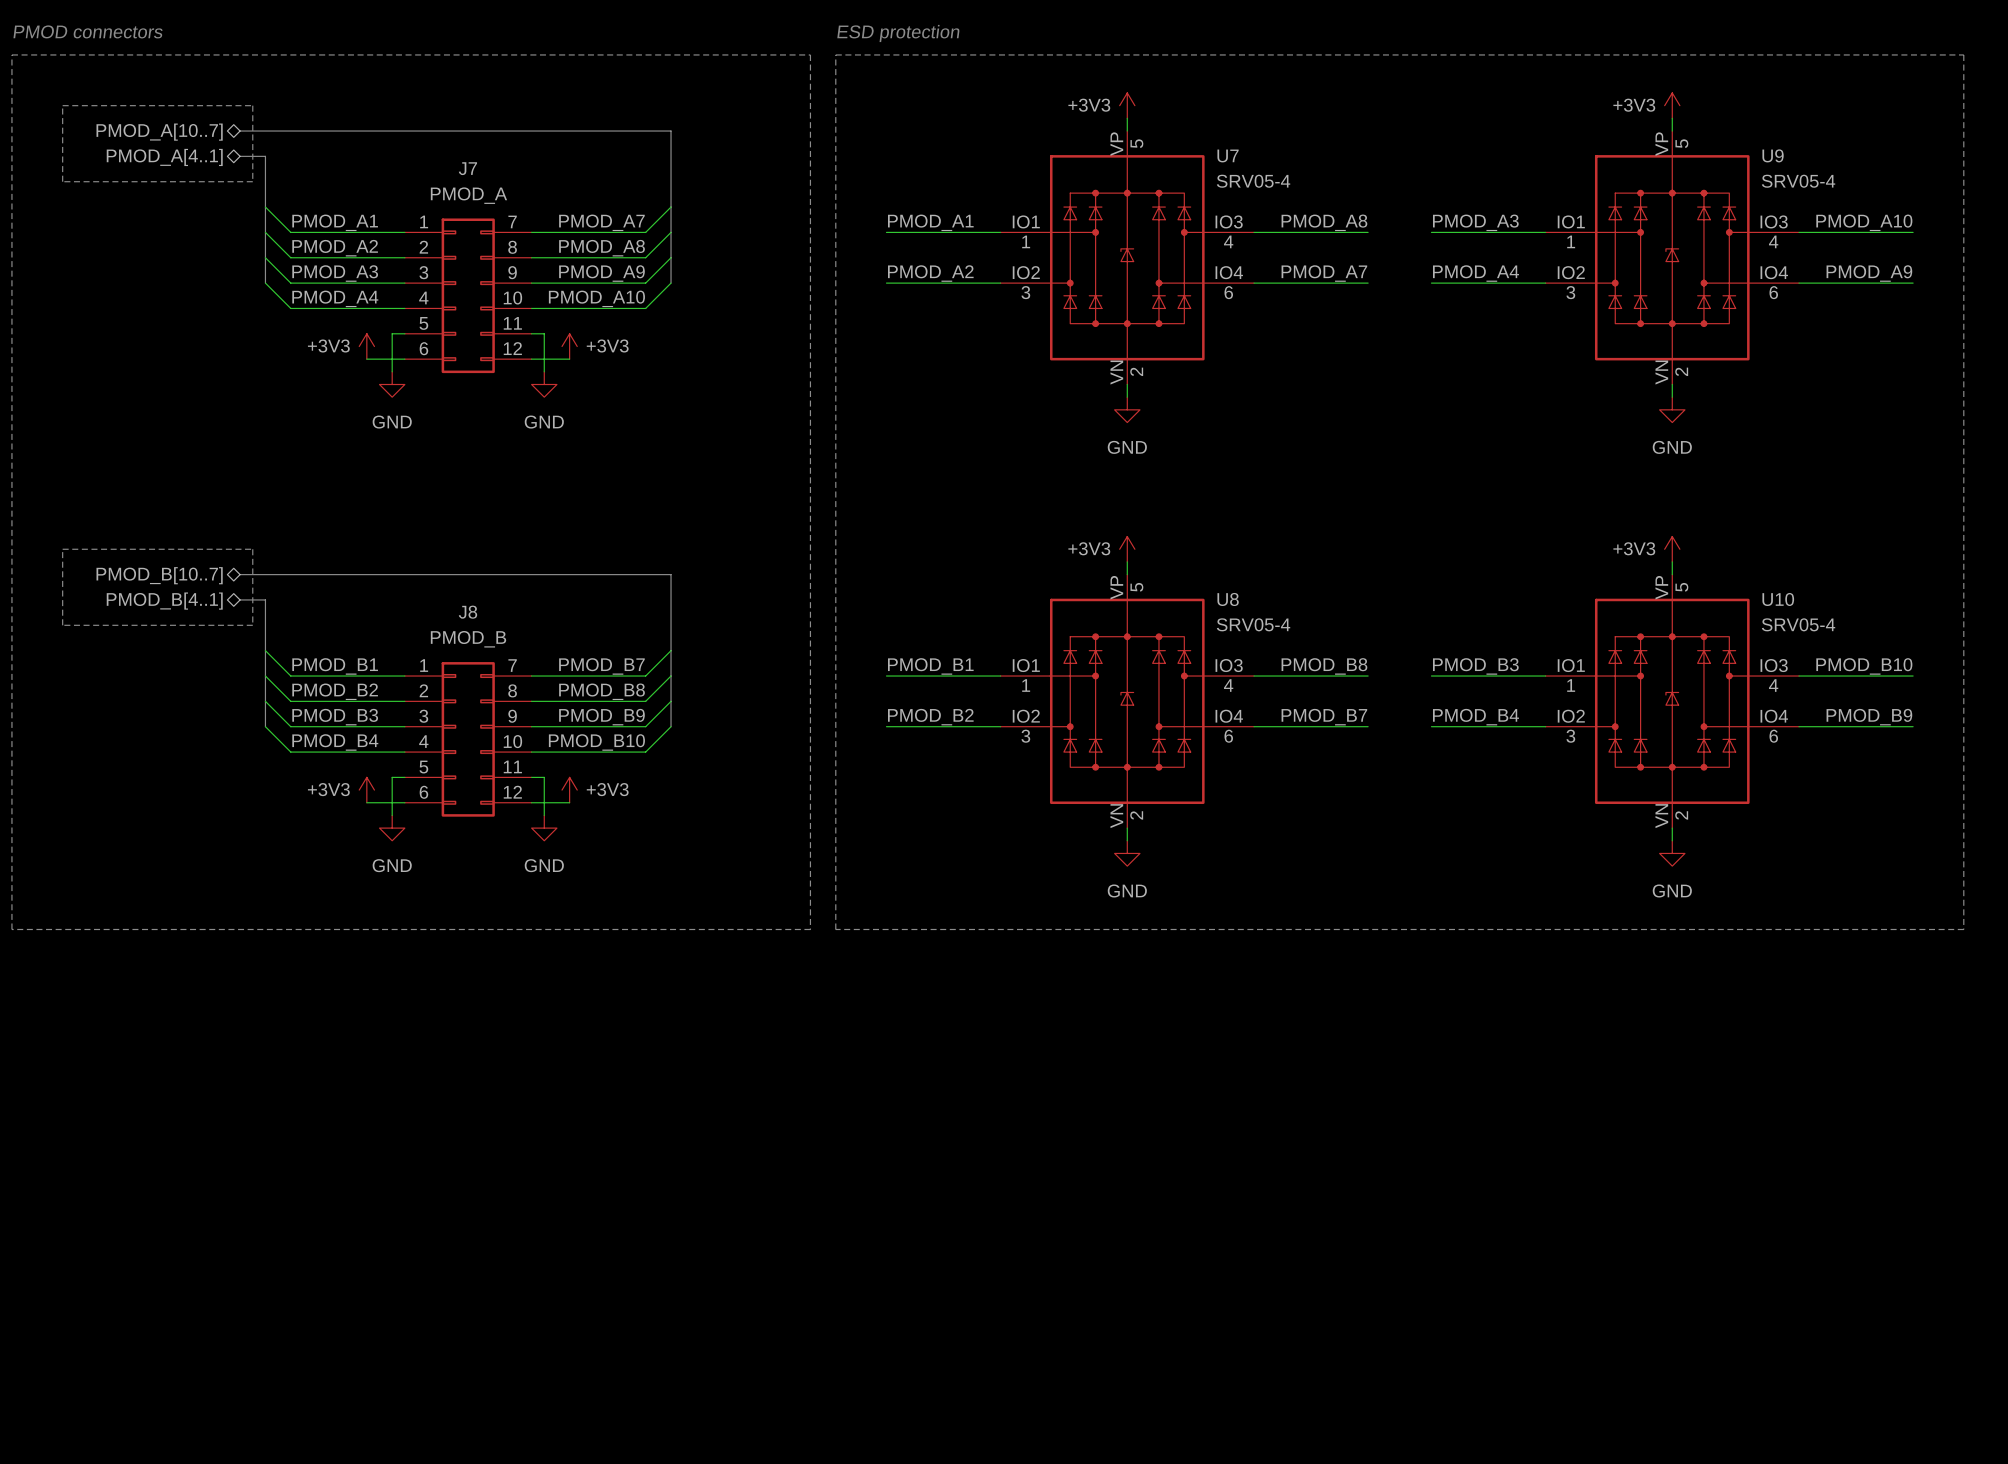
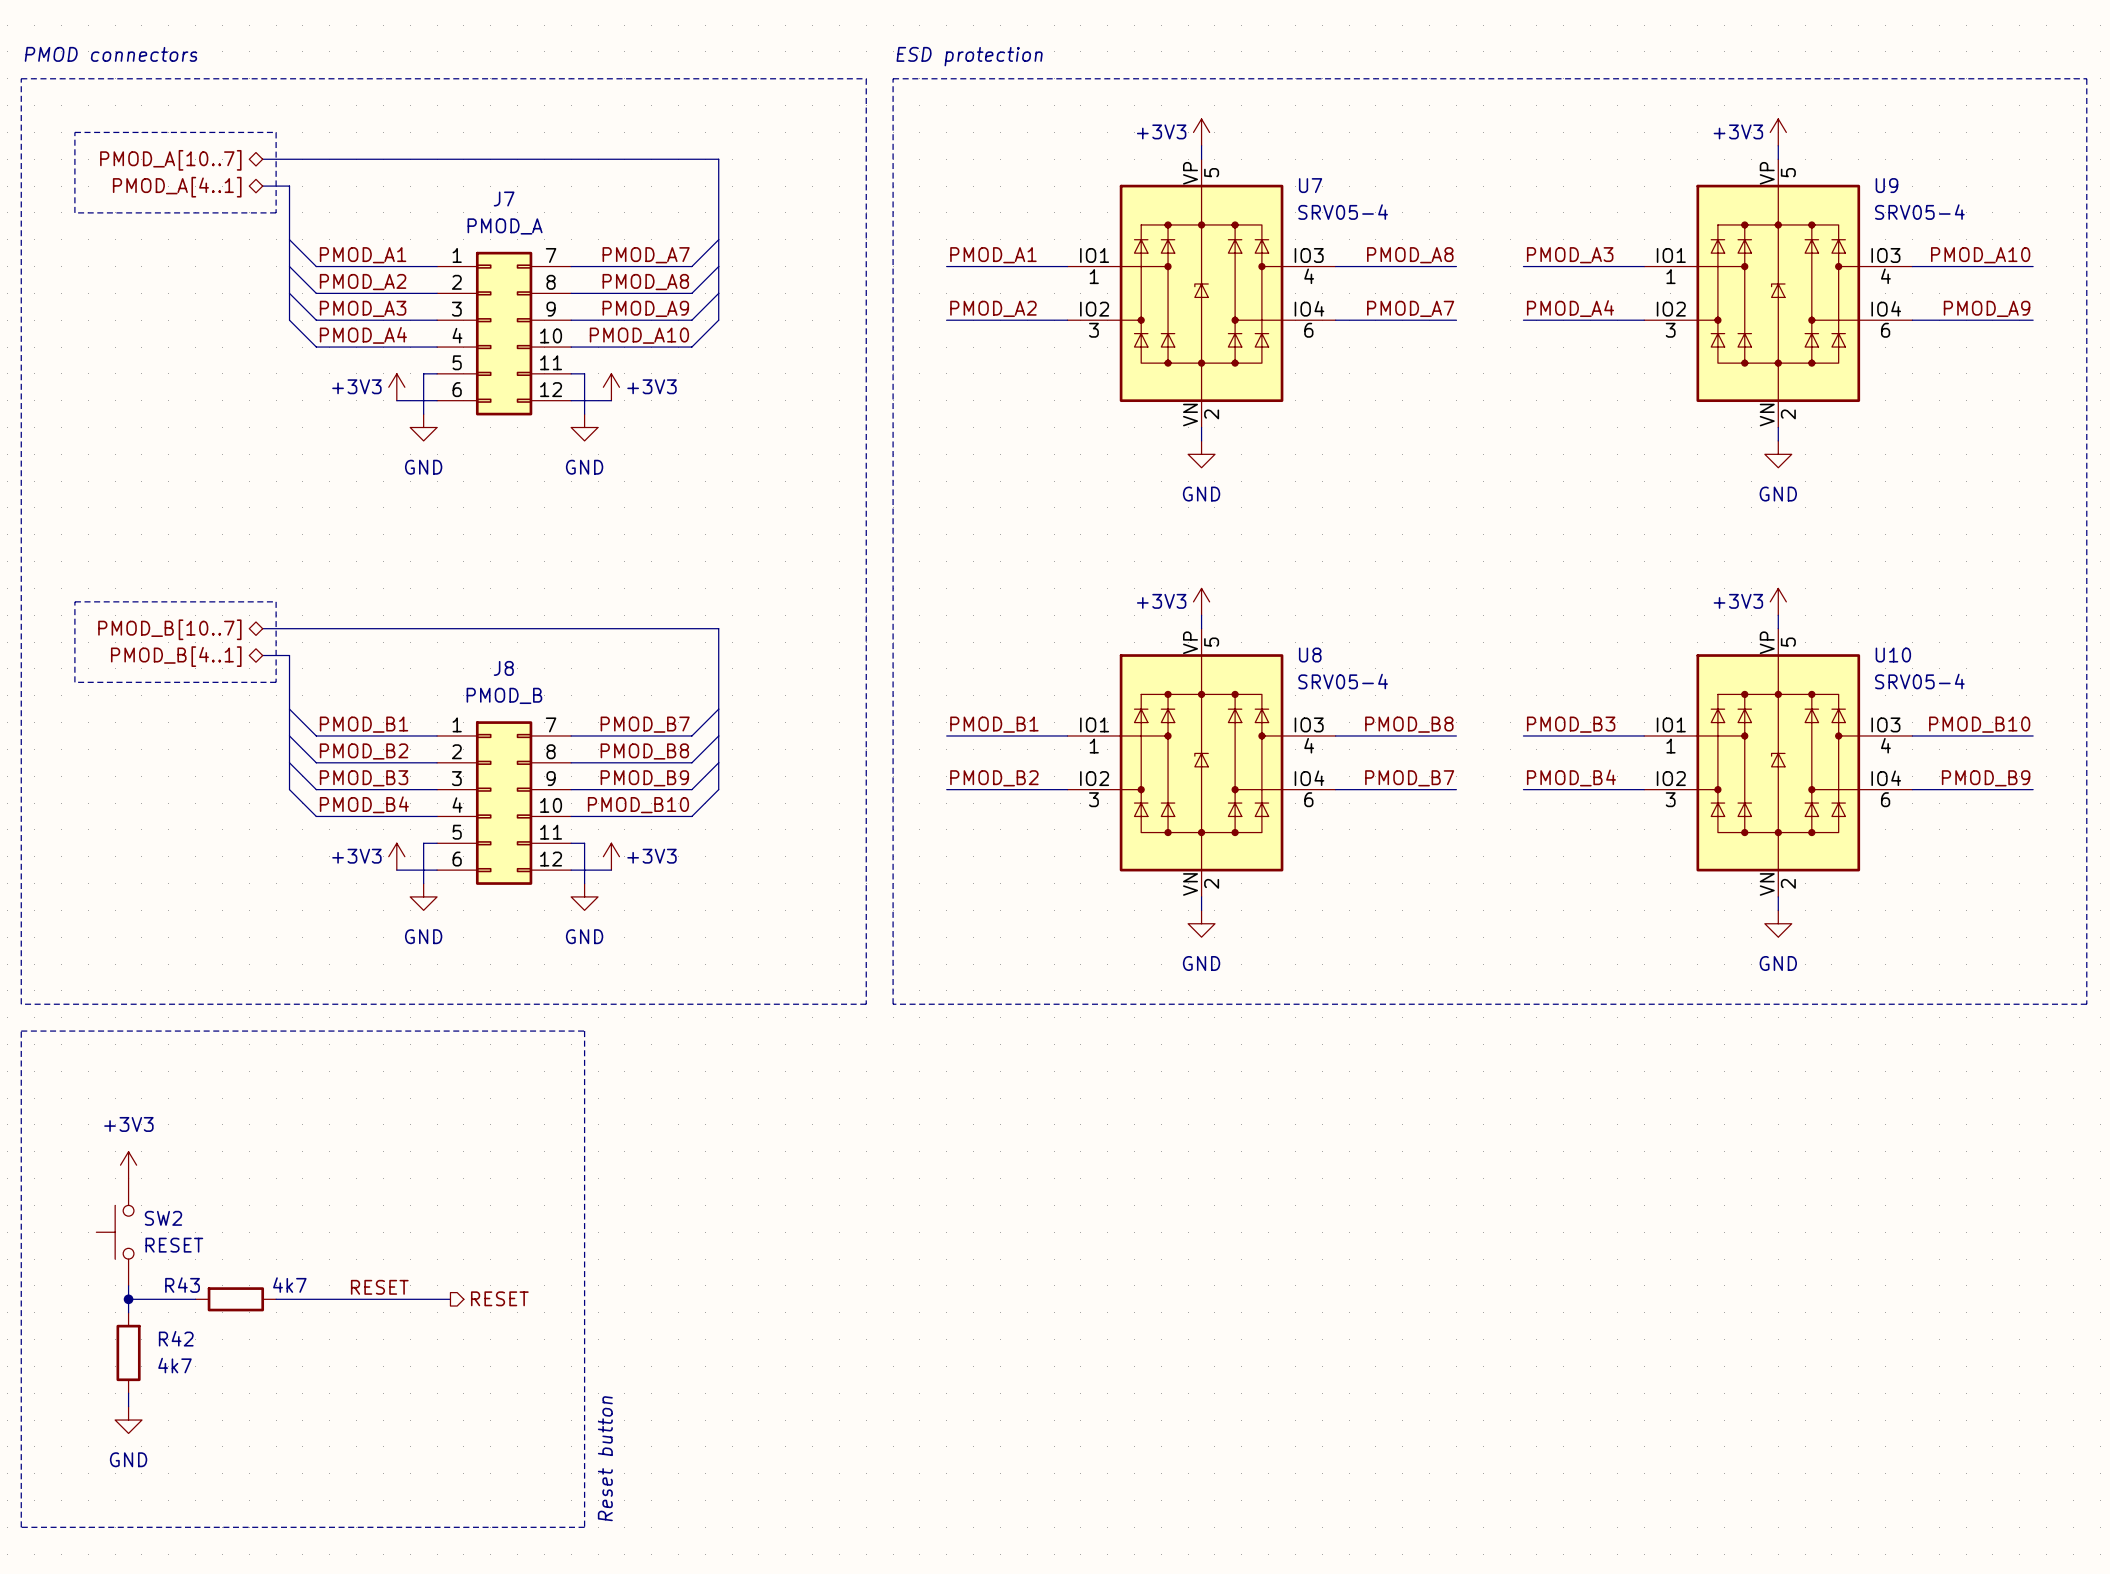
line: none -> (21, 1031) (584, 1031) (584, 1527) (21, 1527) (21, 1031)
power symbol: none -> +3V3 (128, 1165)
SW2: none -> RESET (115, 1232)
wire: none -> (128, 1285) (128, 1312)
label: none -> RESET (379, 1287)
hierarchical label: none -> RESET (499, 1298)
wire: none -> (128, 1299) (195, 1299)
junction: none -> (128, 1299)
R43: none -> 4k7 (235, 1299)
wire: none -> (276, 1299) (450, 1299)
R42: none -> 4k7 (128, 1352)
wire: none -> (128, 1393) (128, 1406)
power symbol: none -> GND (128, 1420)
text: none -> Reset button (605, 1458)

